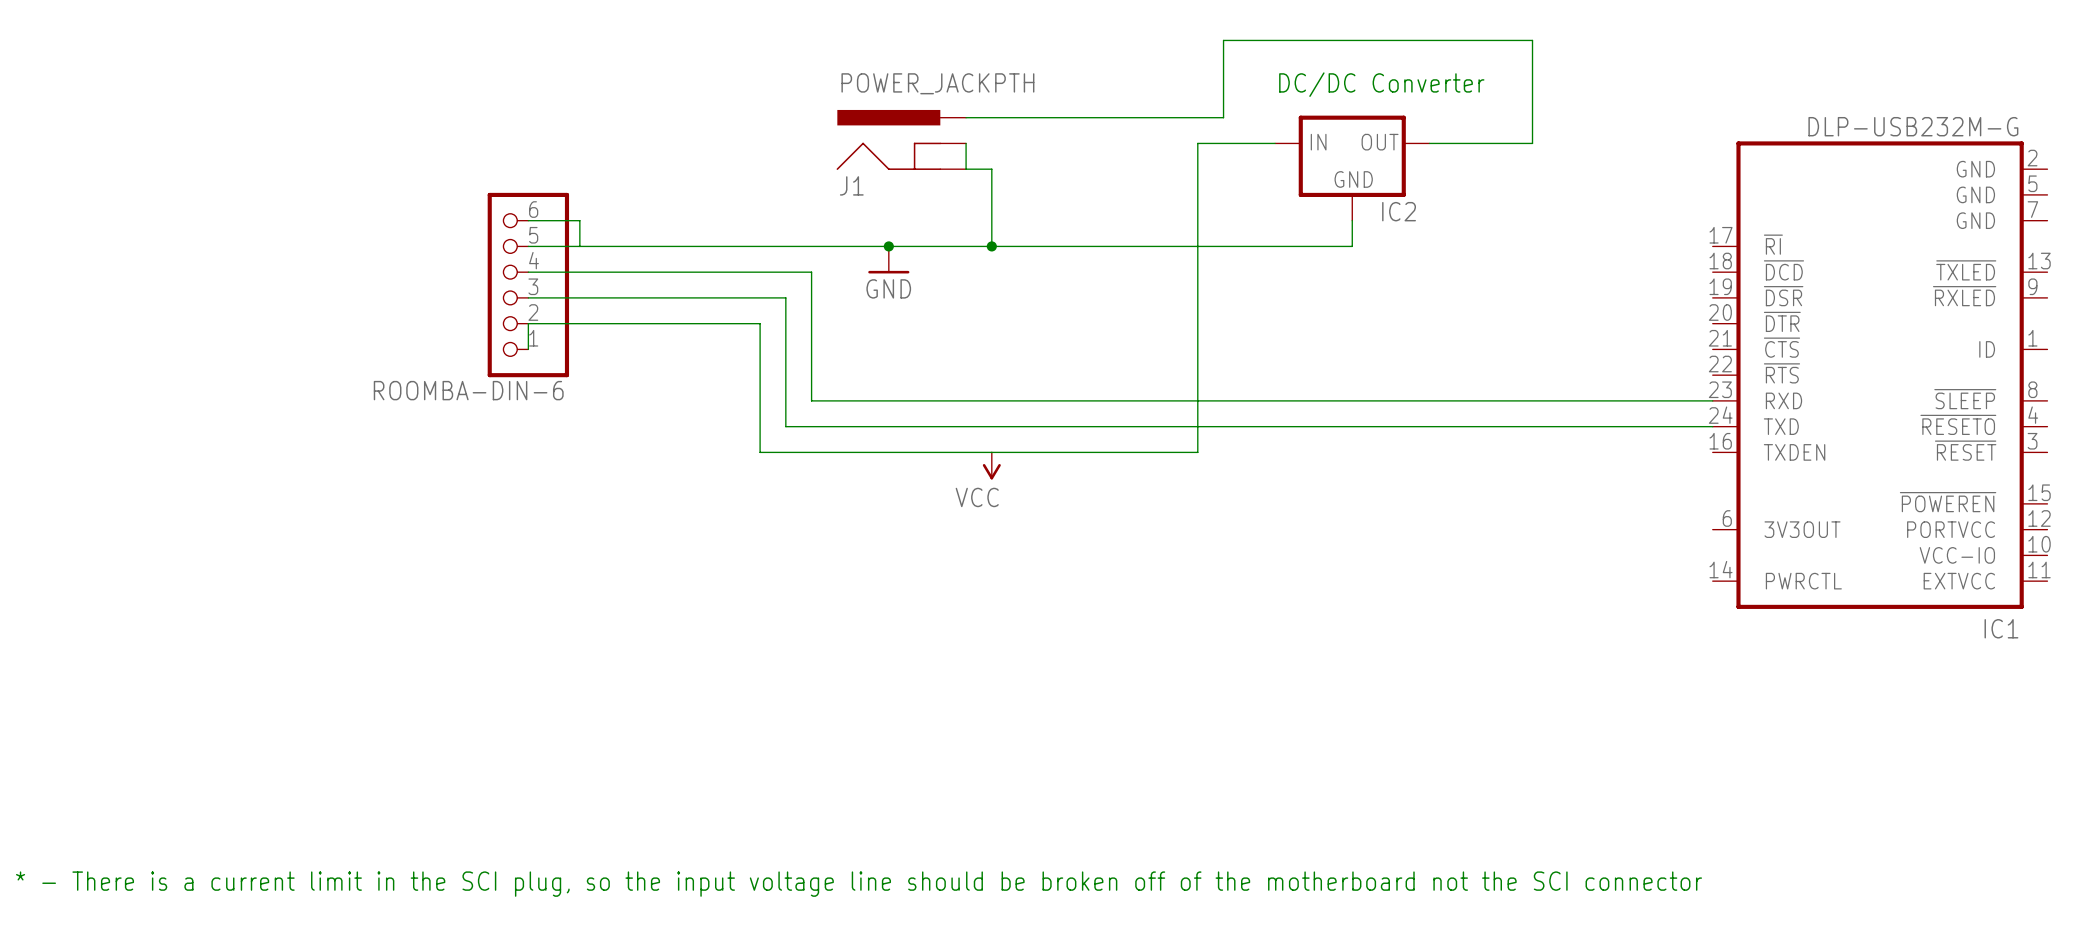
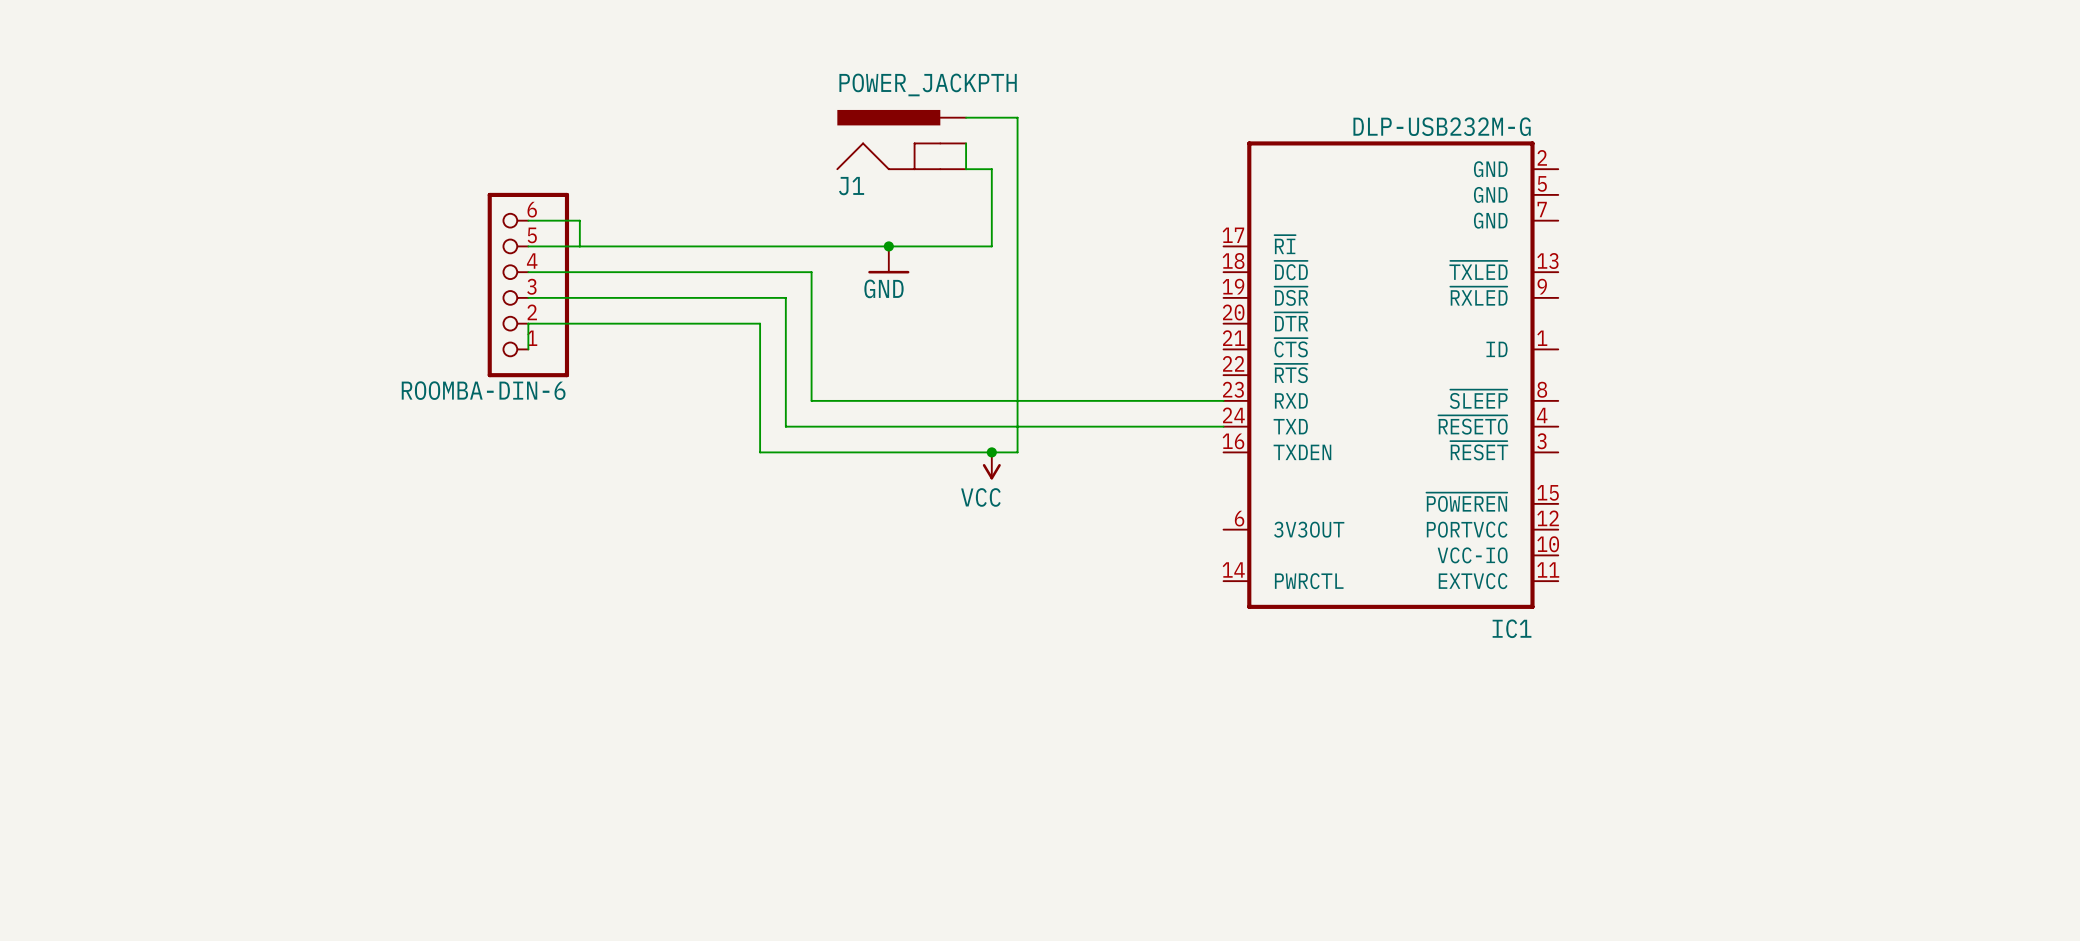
text: DC/DC Converter (1381, 84) -> none
wire: (1017, 117) (1223, 117) (1223, 40) (1532, 40) (1532, 143) (1429, 143) -> none
wire: (1275, 143) (1197, 143) (1197, 452) (1017, 452) -> (1017, 117) (1017, 452)
IC2: (1352, 168) -> none
wire: (1352, 220) (1352, 246) (991, 246) -> none
junction: (991, 246) -> none
IC1 position: (1880, 375) -> (1390, 375)
wire: (1223, 400) (1712, 400) -> none
wire: (1223, 426) (1712, 426) -> none
junction: none -> (991, 452)
text: * - There is a current limit in the SCI plug, so the input voltage line should be broken off of the motherboard not the SCI connector (859, 884) -> none

